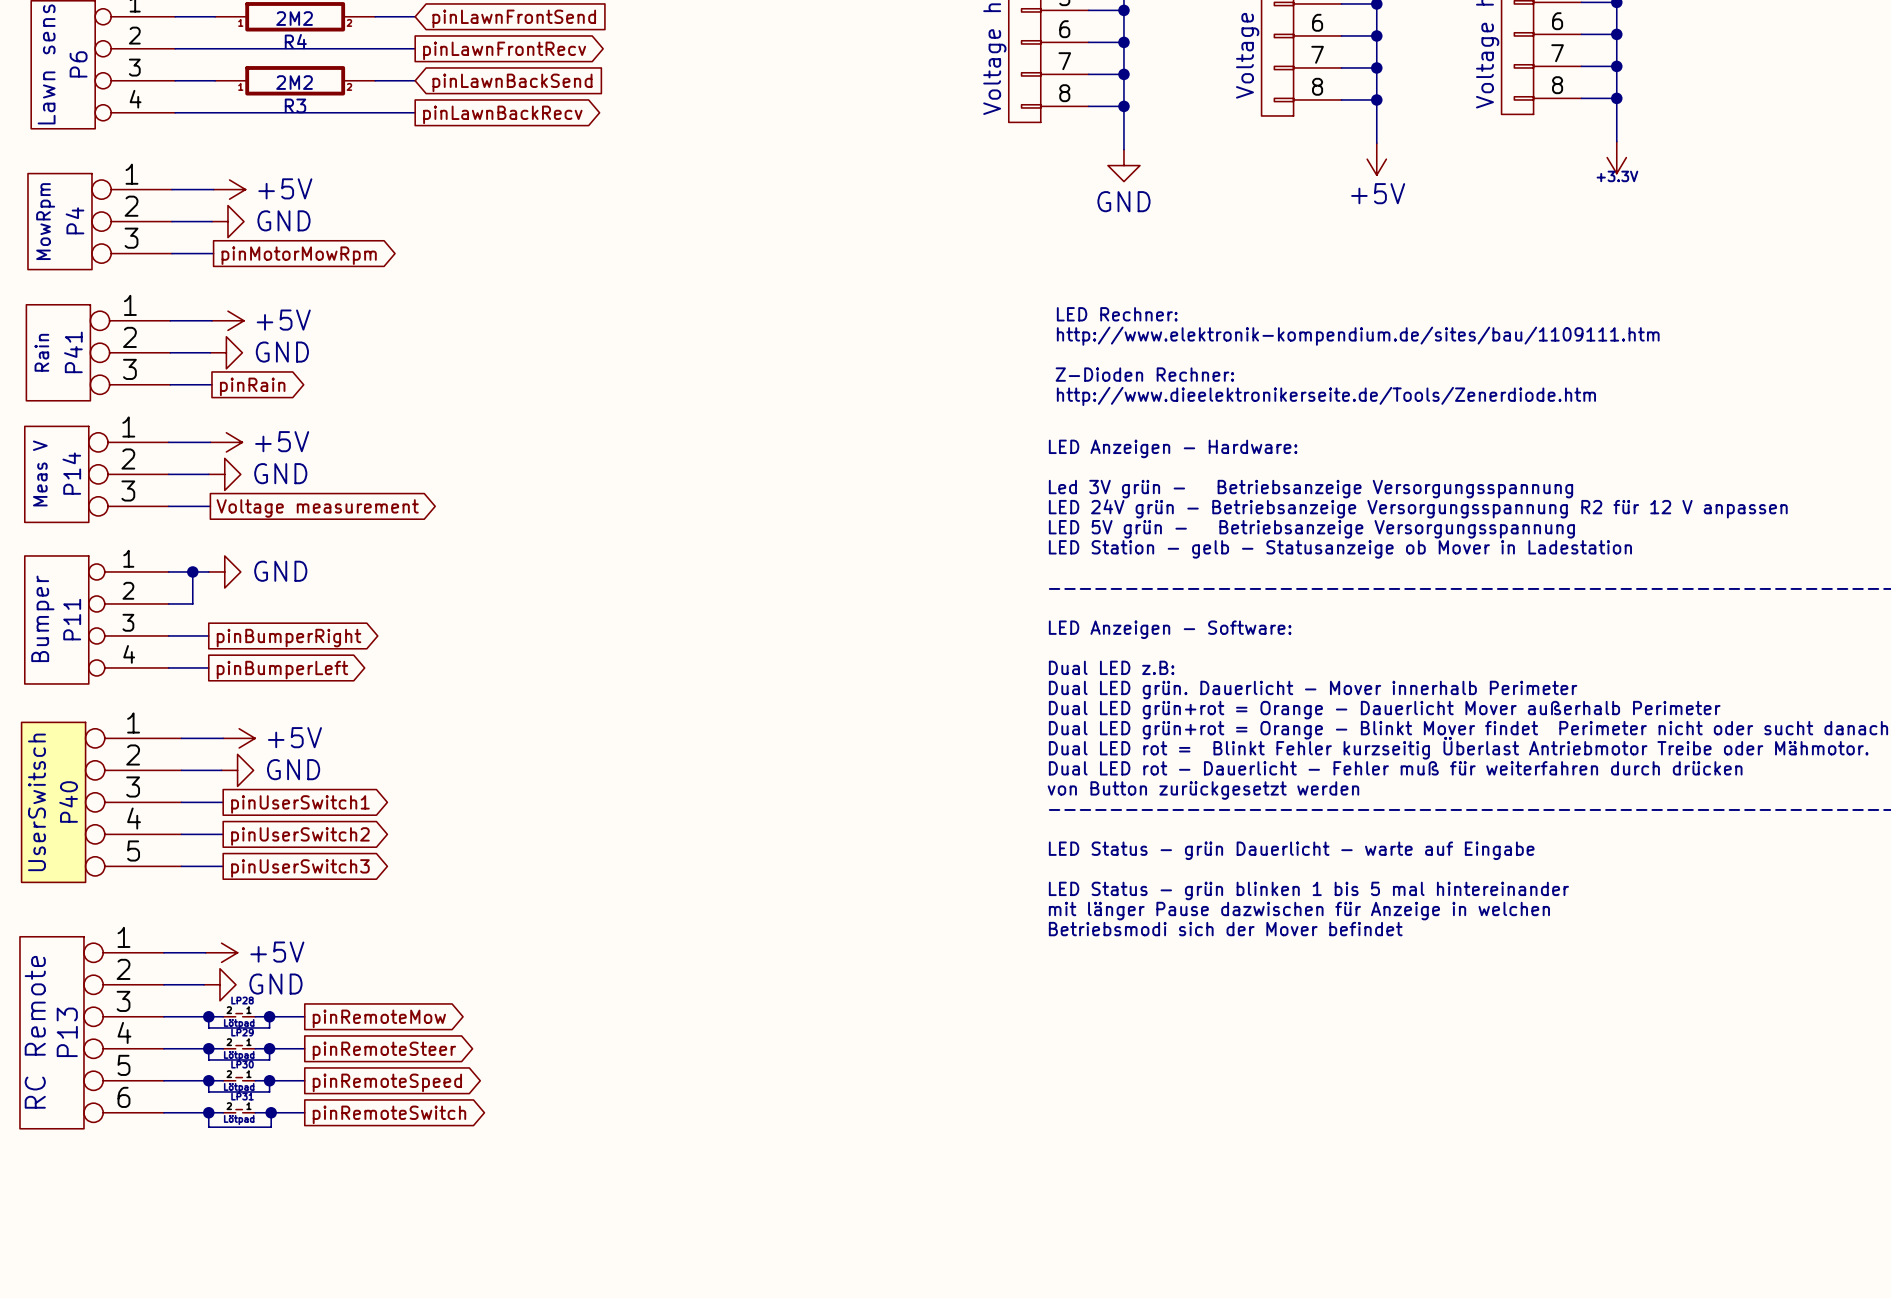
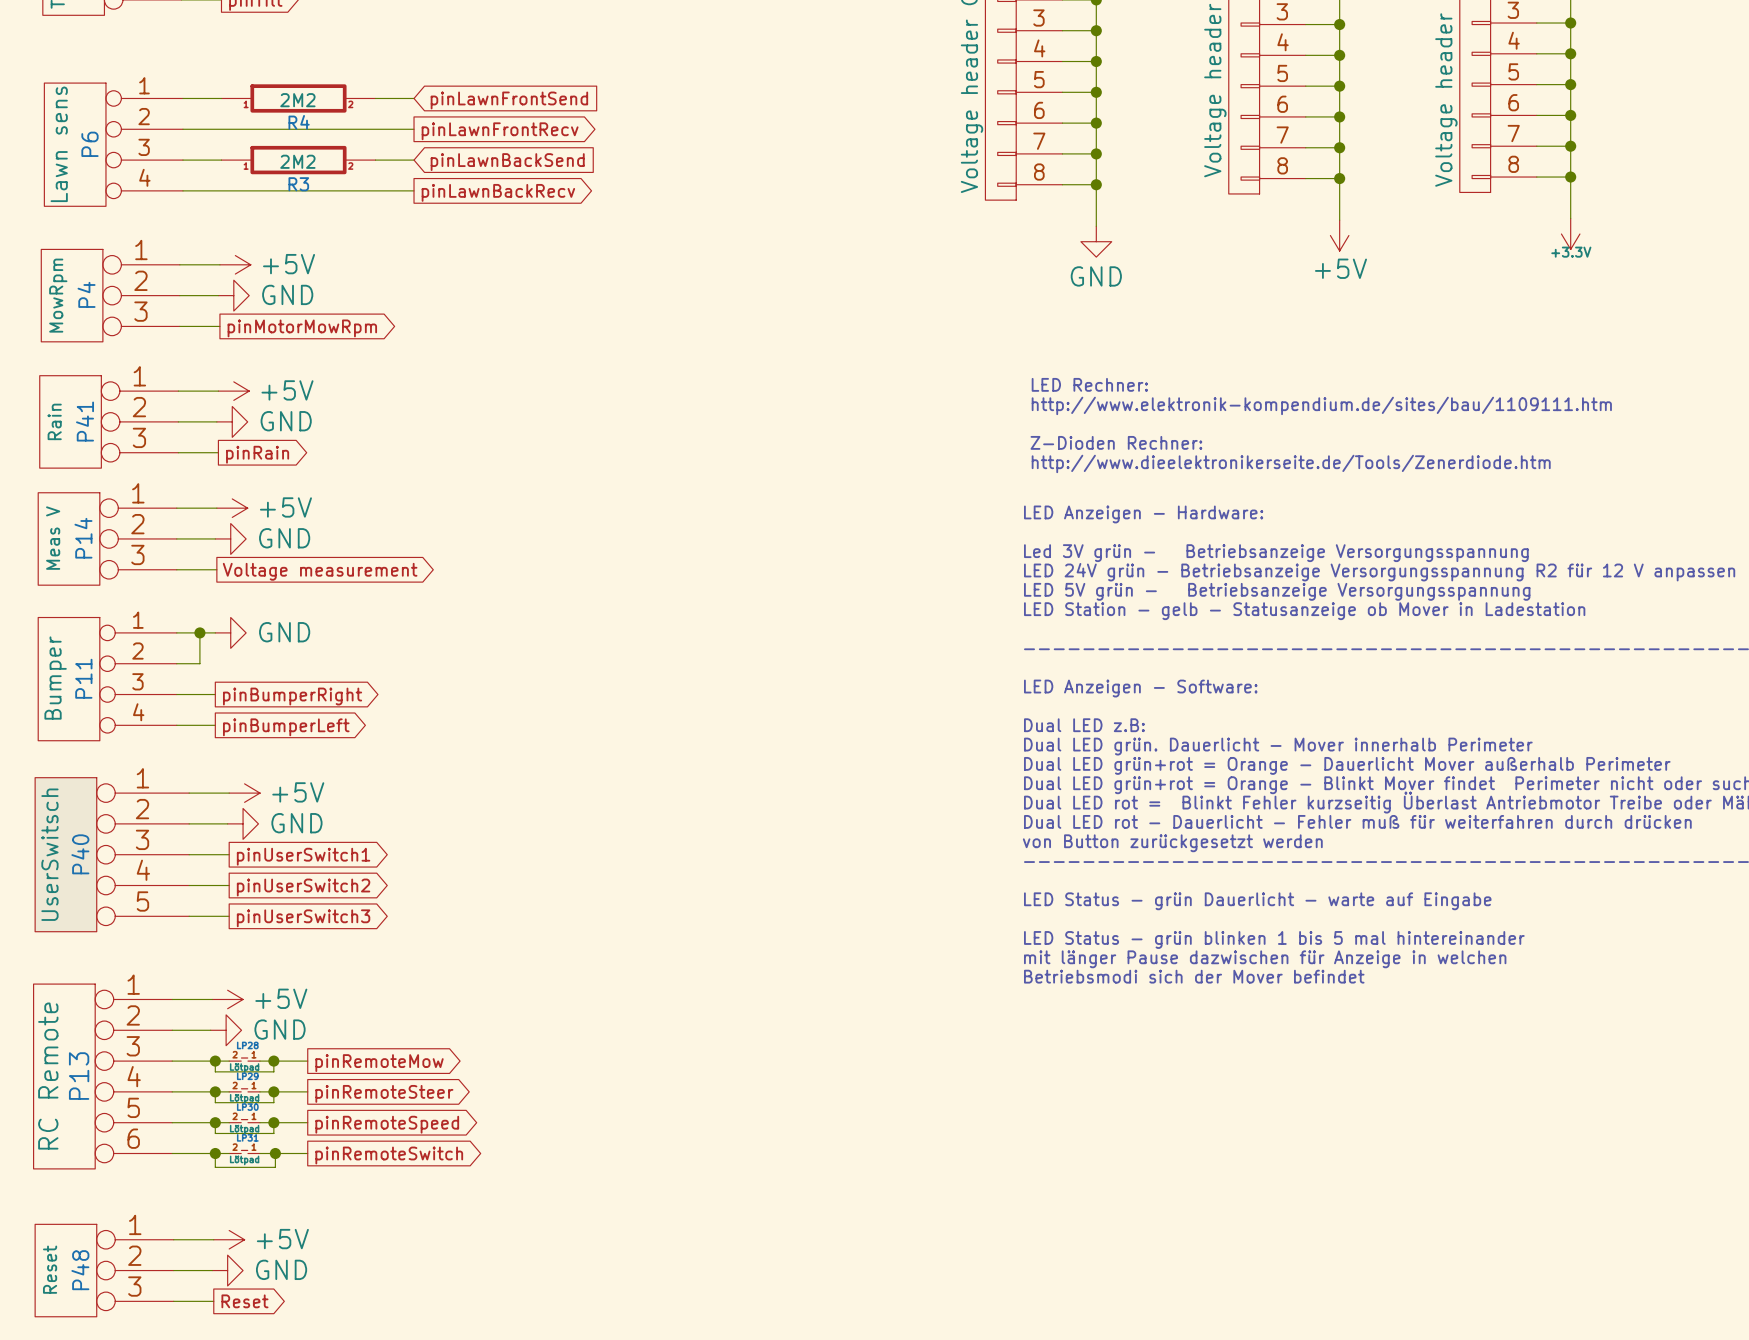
wire: none -> (173, 1239) (213, 1239)
power symbol: none -> +5V (229, 1239)
P48: none -> Reset (104, 1270)
wire: none -> (173, 1270) (212, 1270)
power symbol: none -> GND (227, 1270)
wire: none -> (173, 1301) (213, 1301)
global label: none -> Reset (244, 1301)

